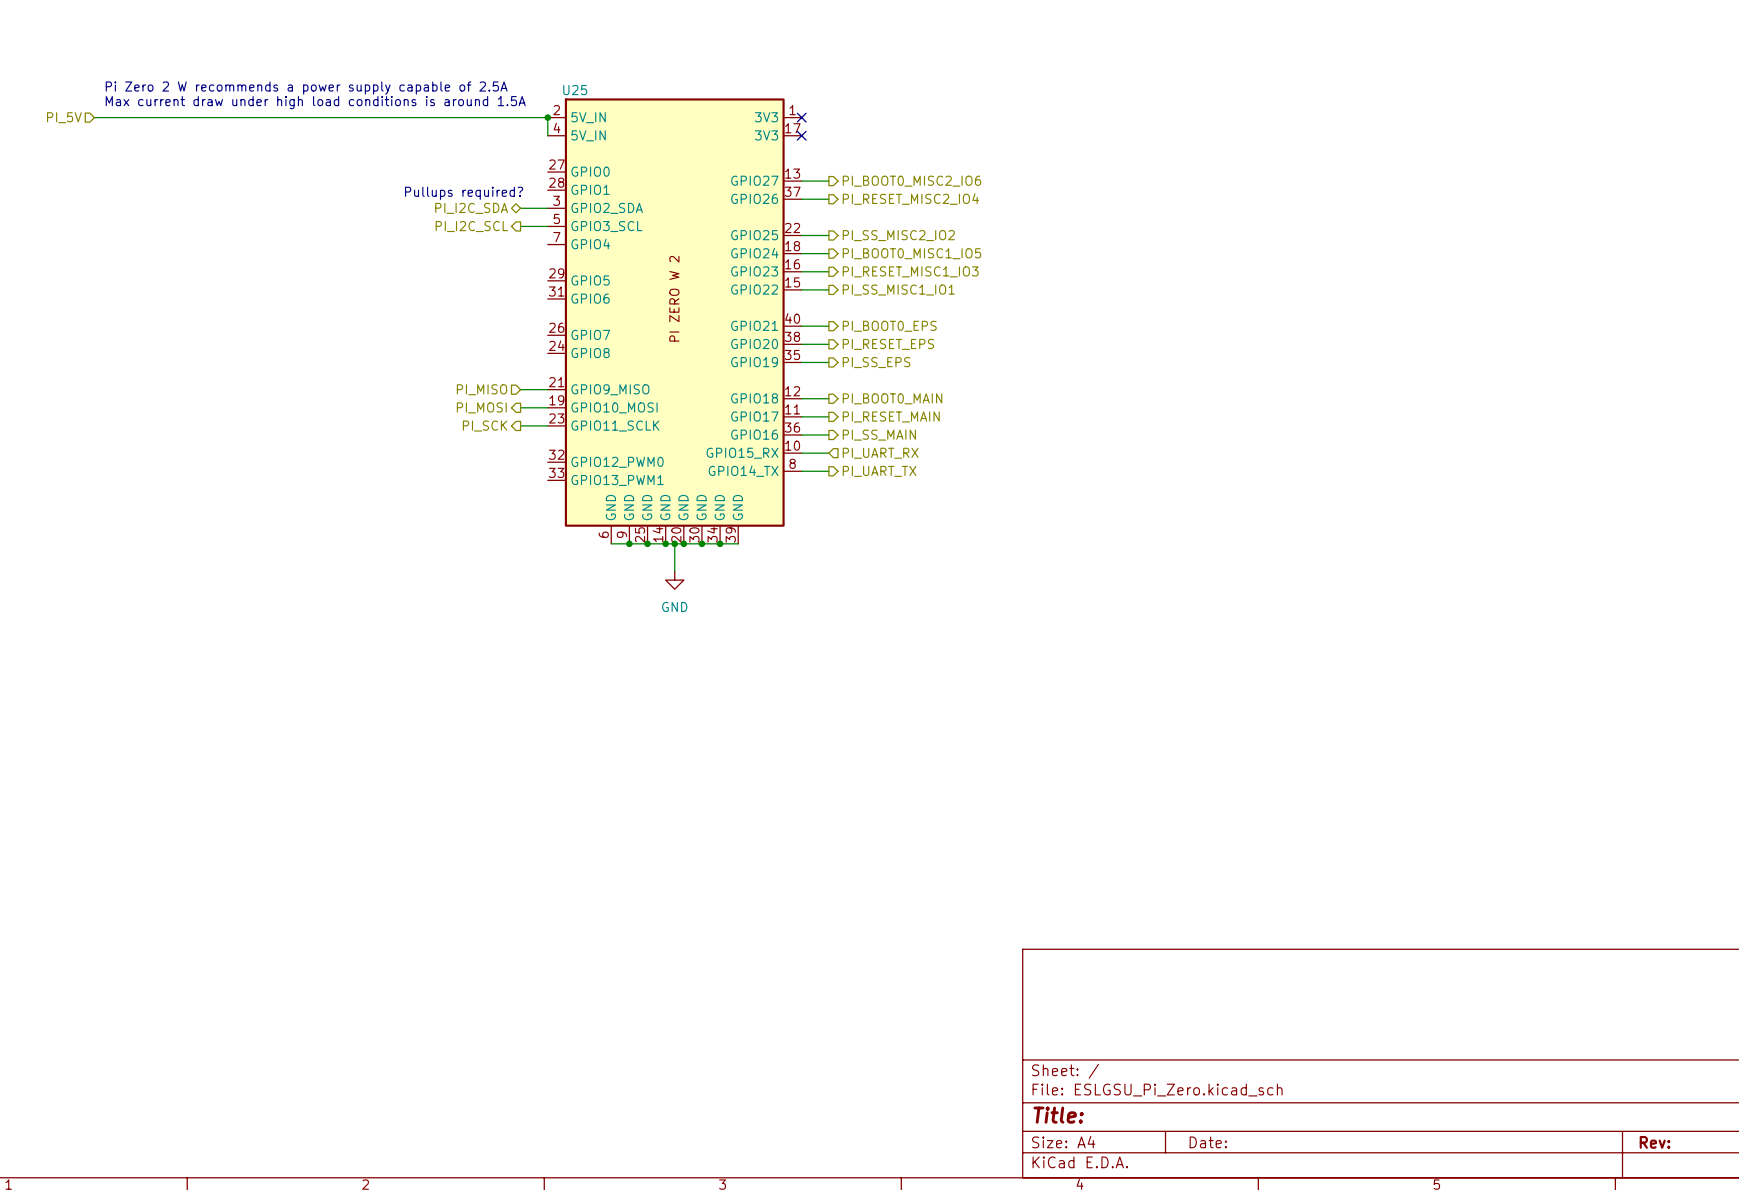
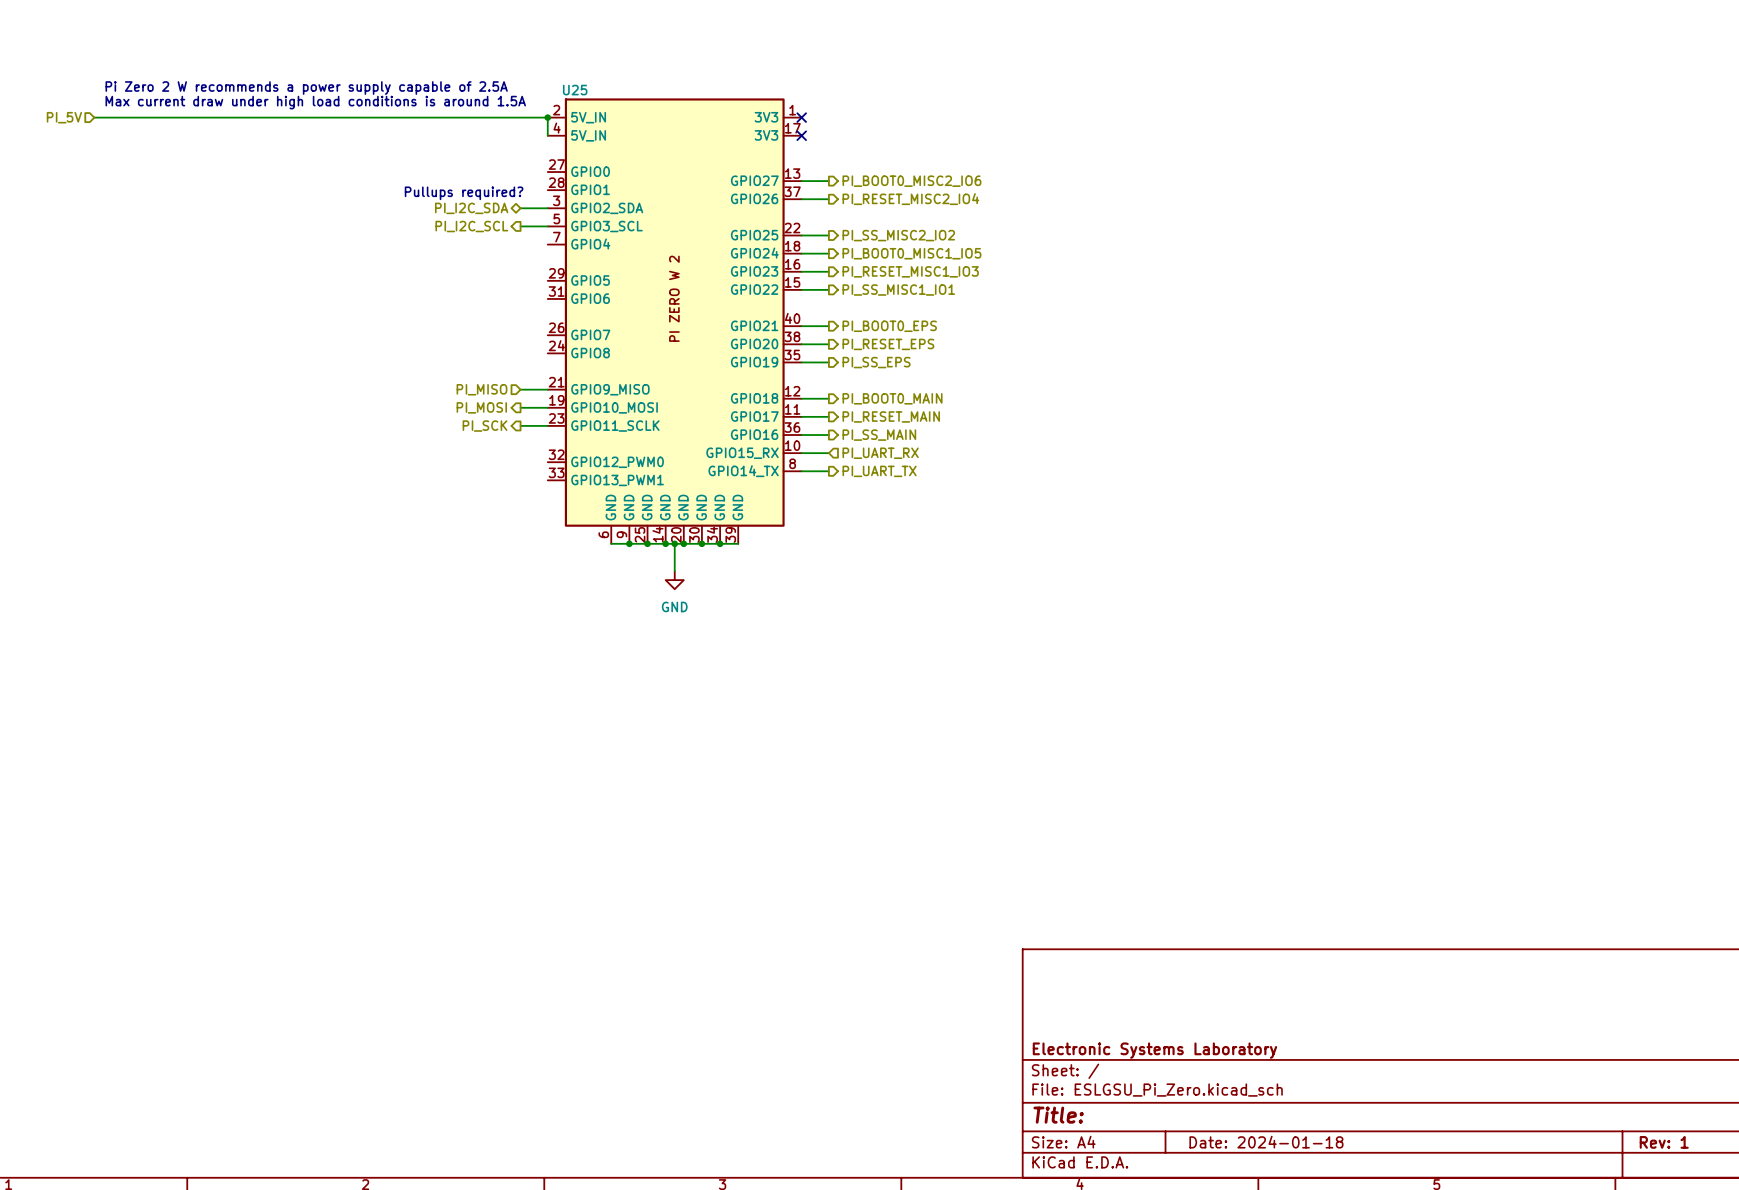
title block: none -> Electronic Systems Laboratory (1154, 1050)
title block: Date: (1208, 1142) -> Date: 2024-01-18 (1266, 1142)
title block: Rev: (1655, 1142) -> Rev: 1 (1664, 1142)

